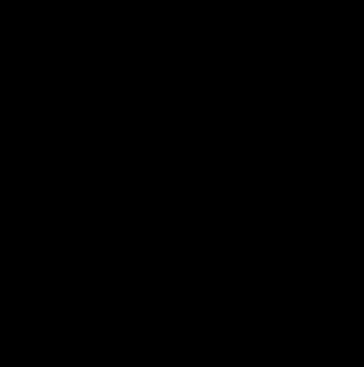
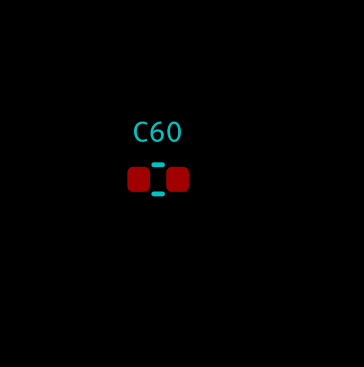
C60: none -> (158, 179)

